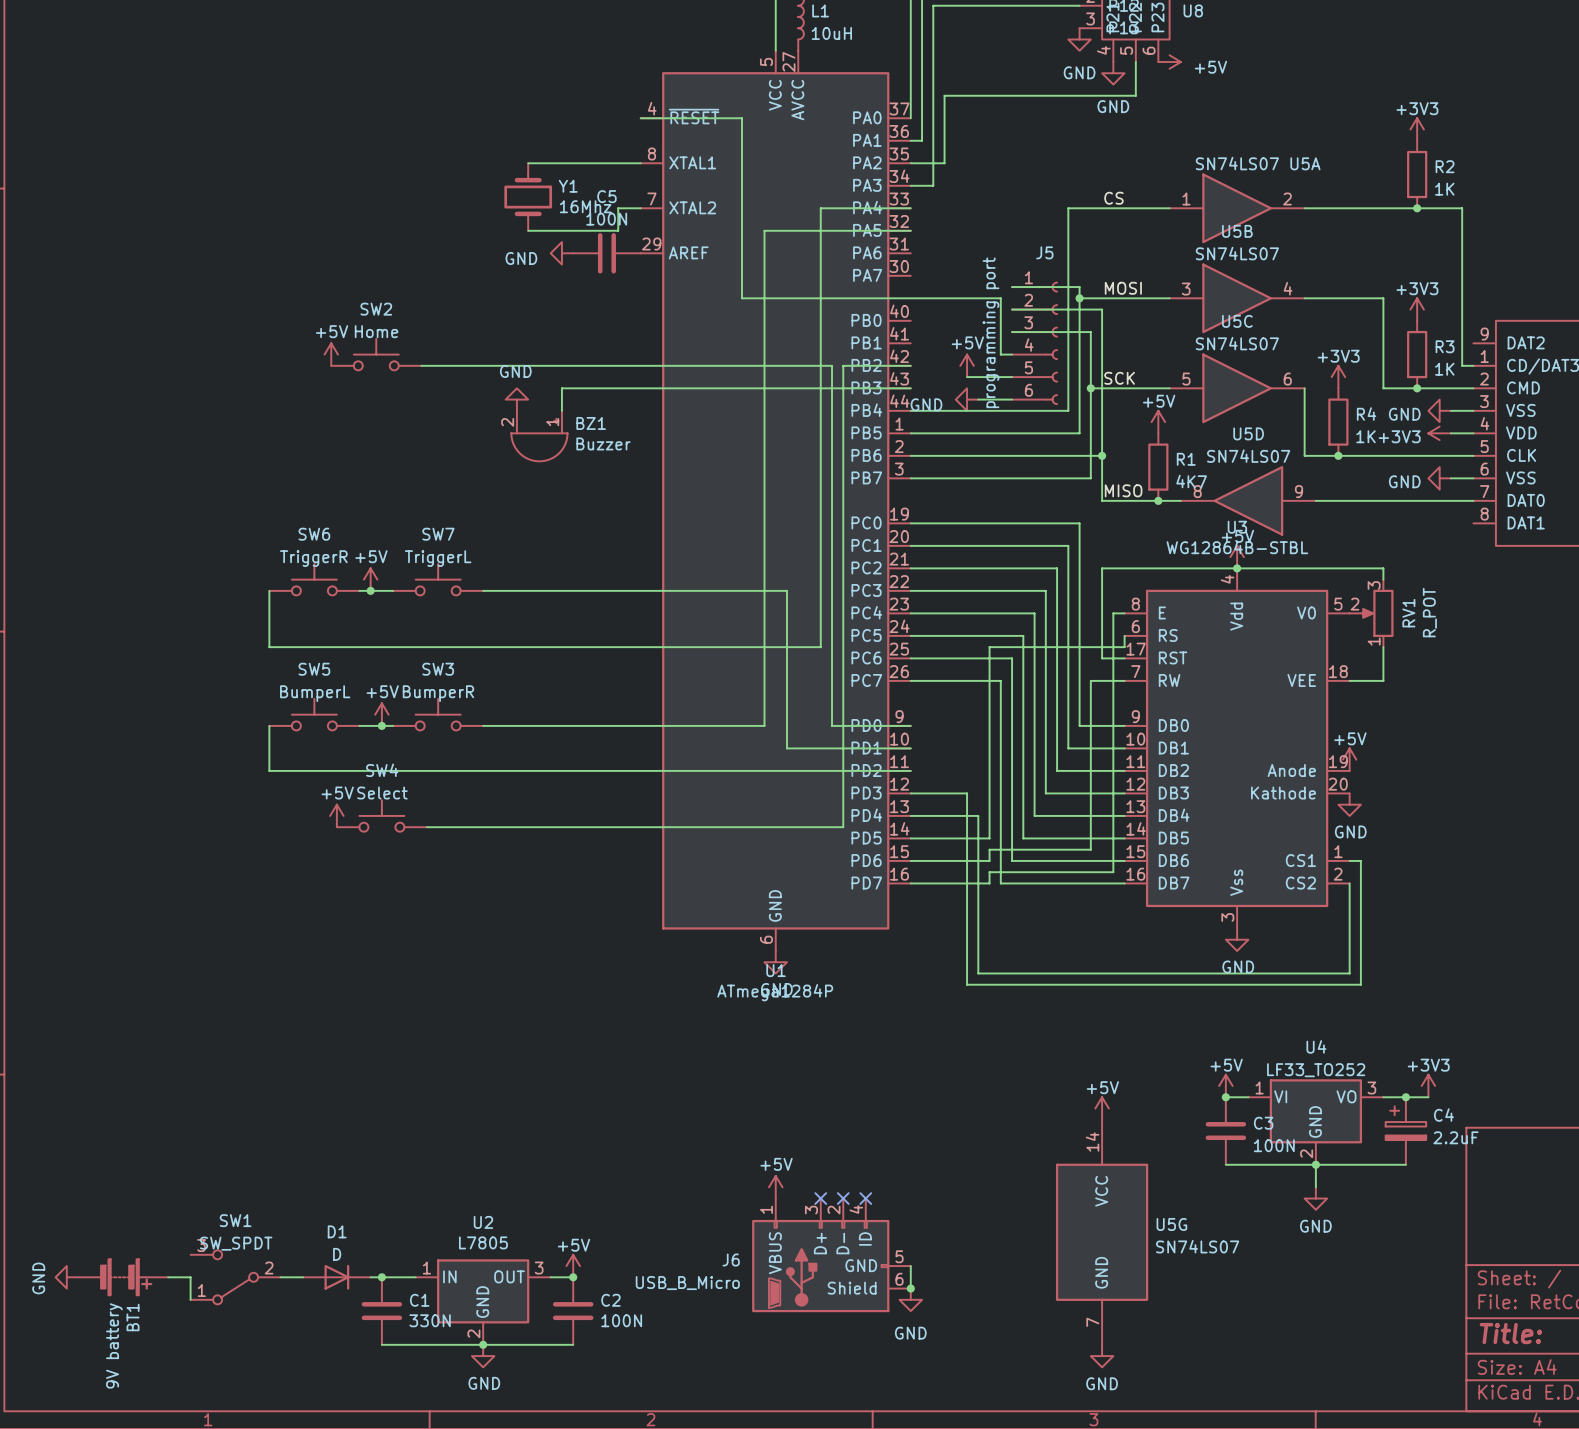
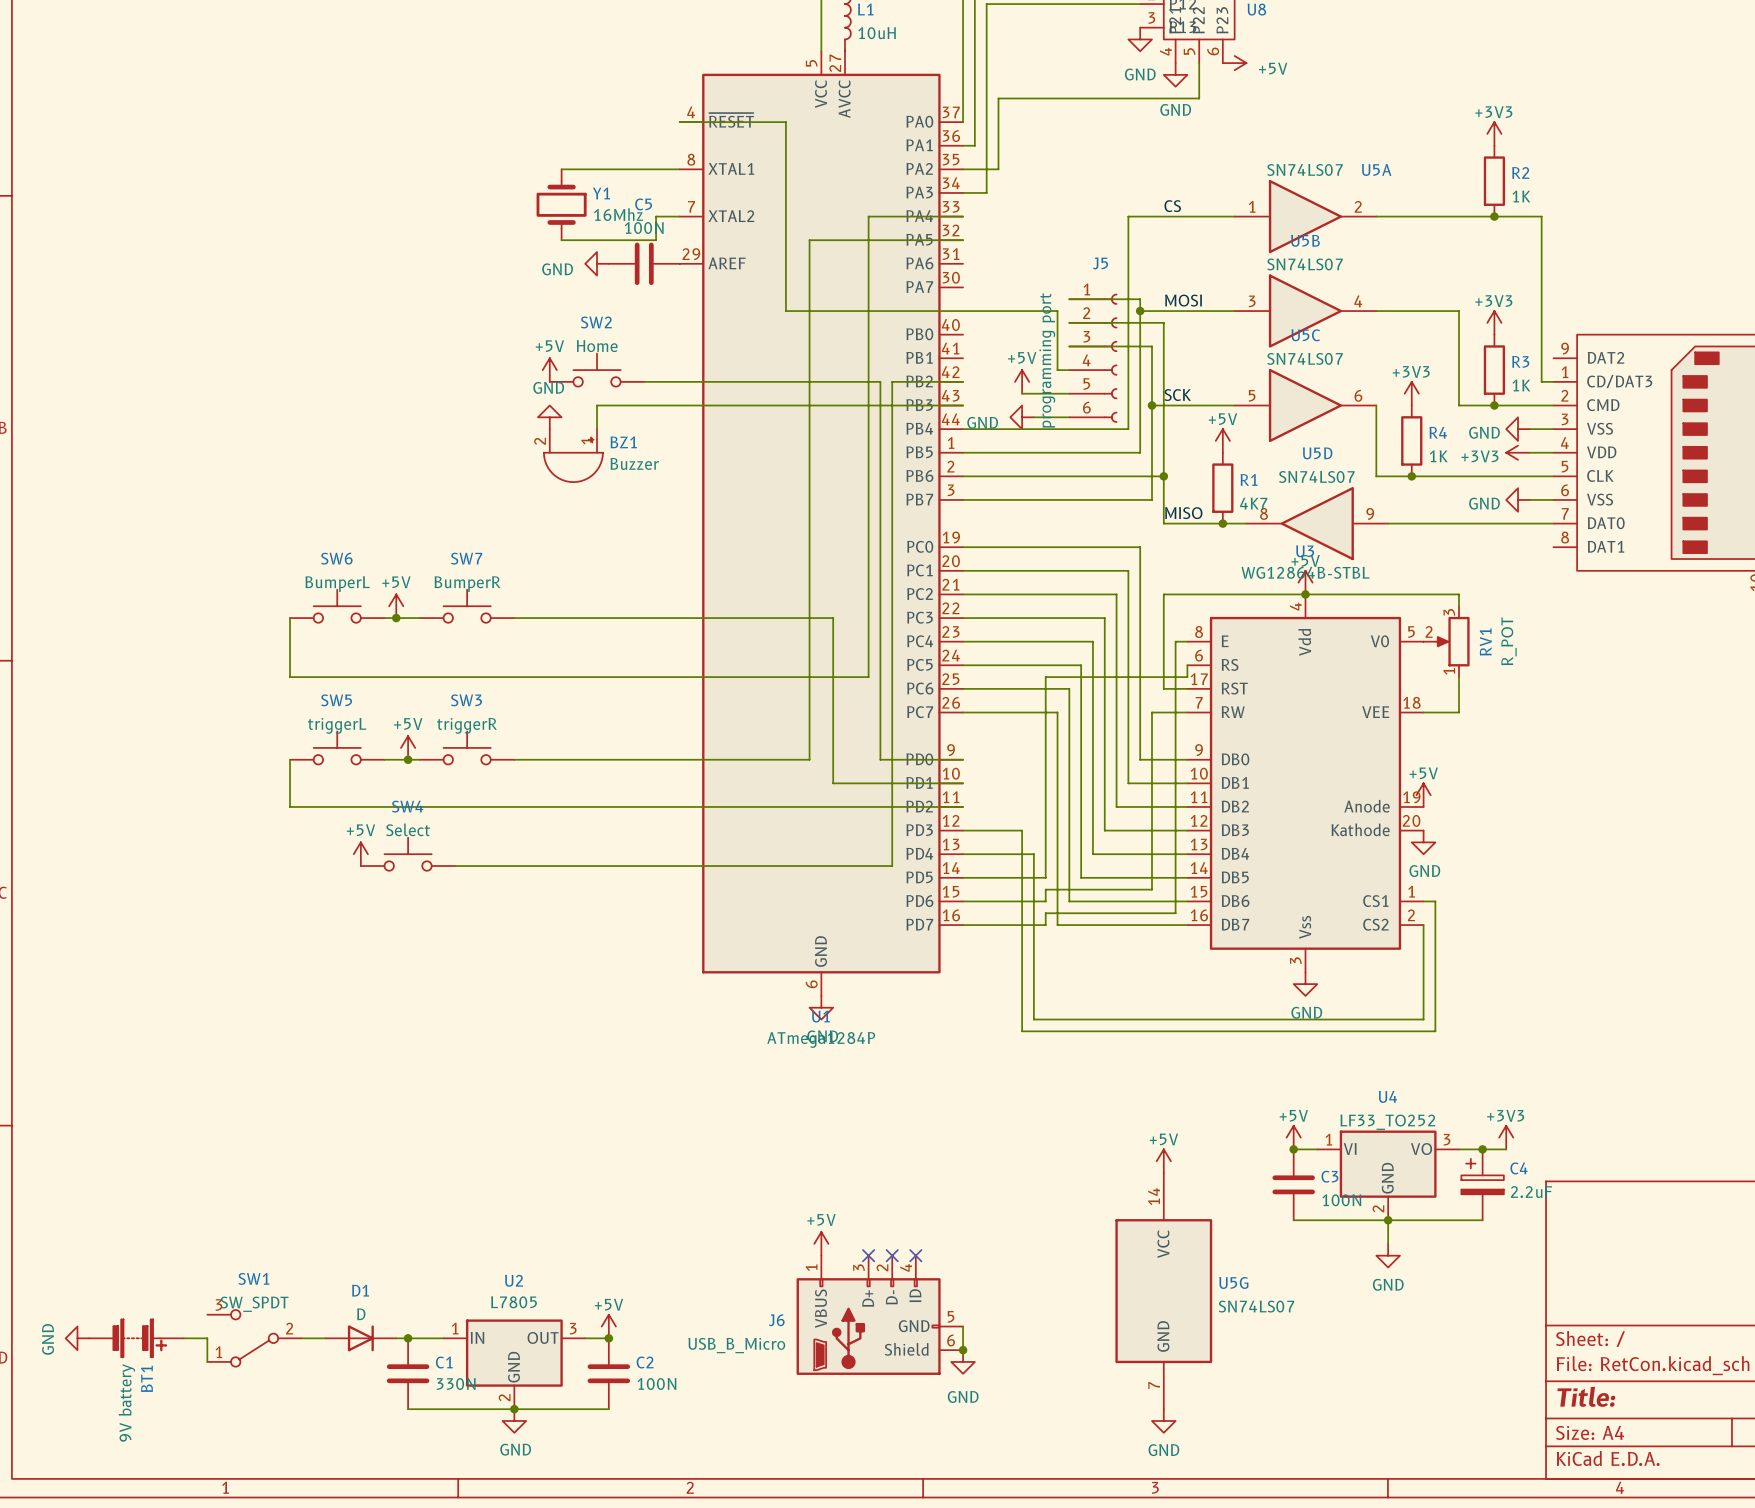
power symbol position: +5V (331, 354) -> +5V (549, 370)
SW2 position: (376, 354) -> (597, 370)
wire: (421, 365) (606, 365) -> none
SW6 value: TriggerR (313, 558) -> BumperL (337, 584)
SW7 value: TriggerL (438, 558) -> BumperR (467, 584)
SW5 value: BumperL (315, 693) -> triggerL (337, 725)
SW3 value: BumperR (438, 693) -> triggerR (467, 725)

